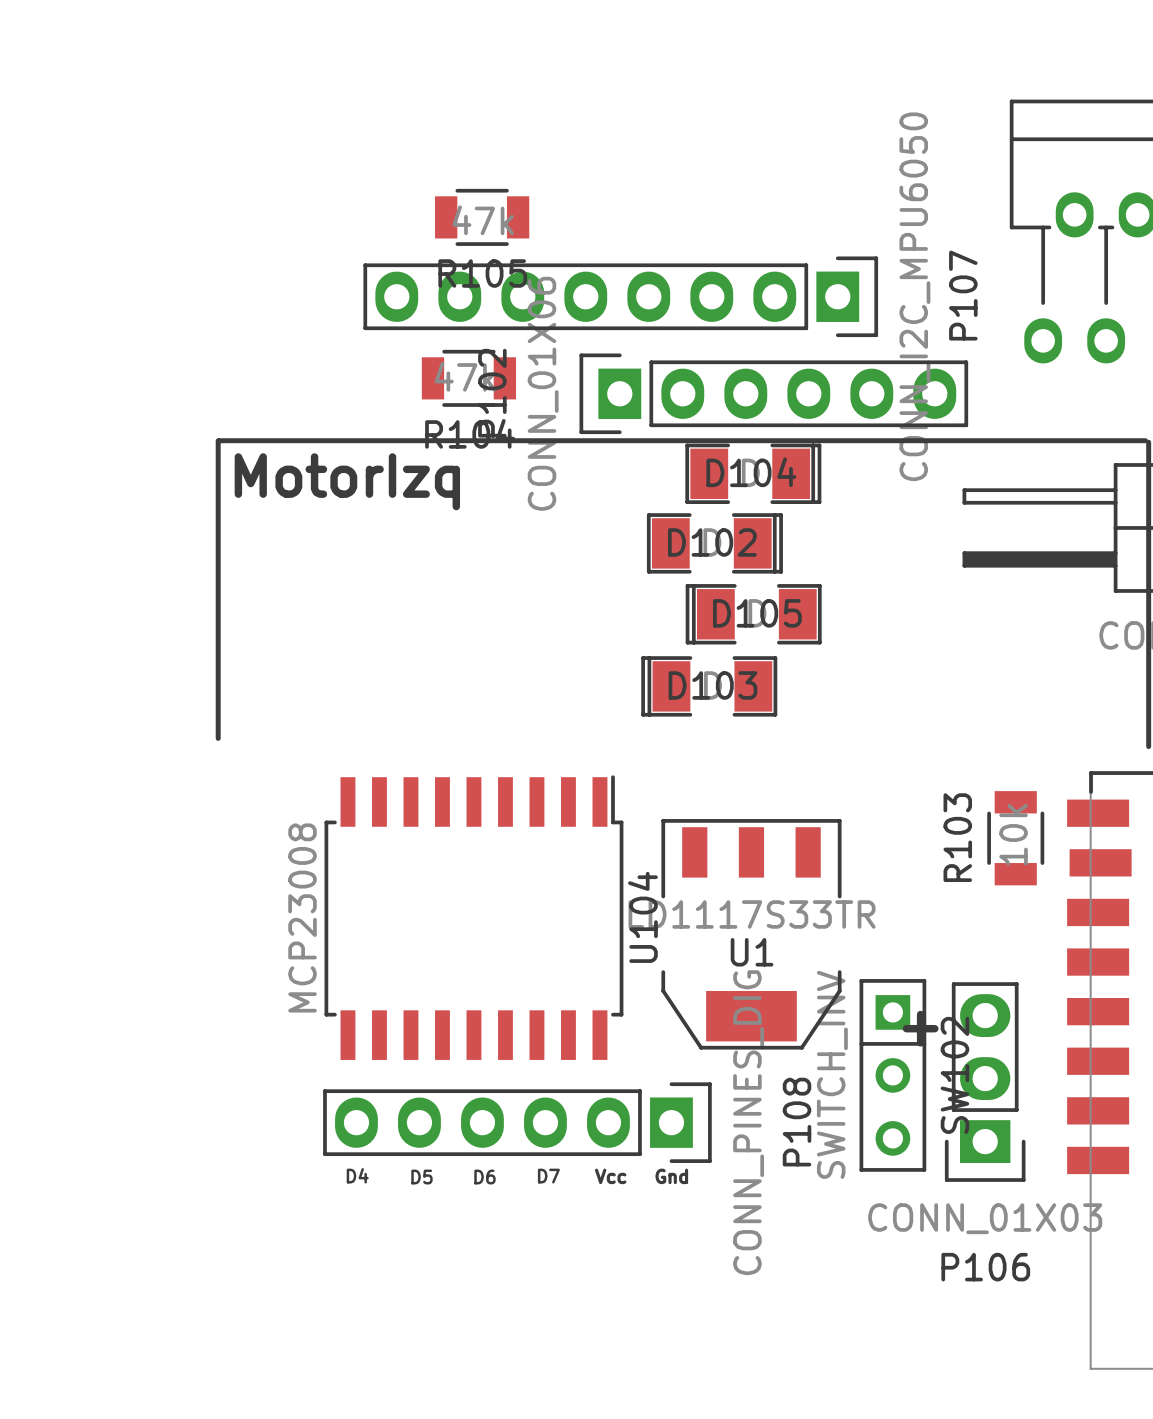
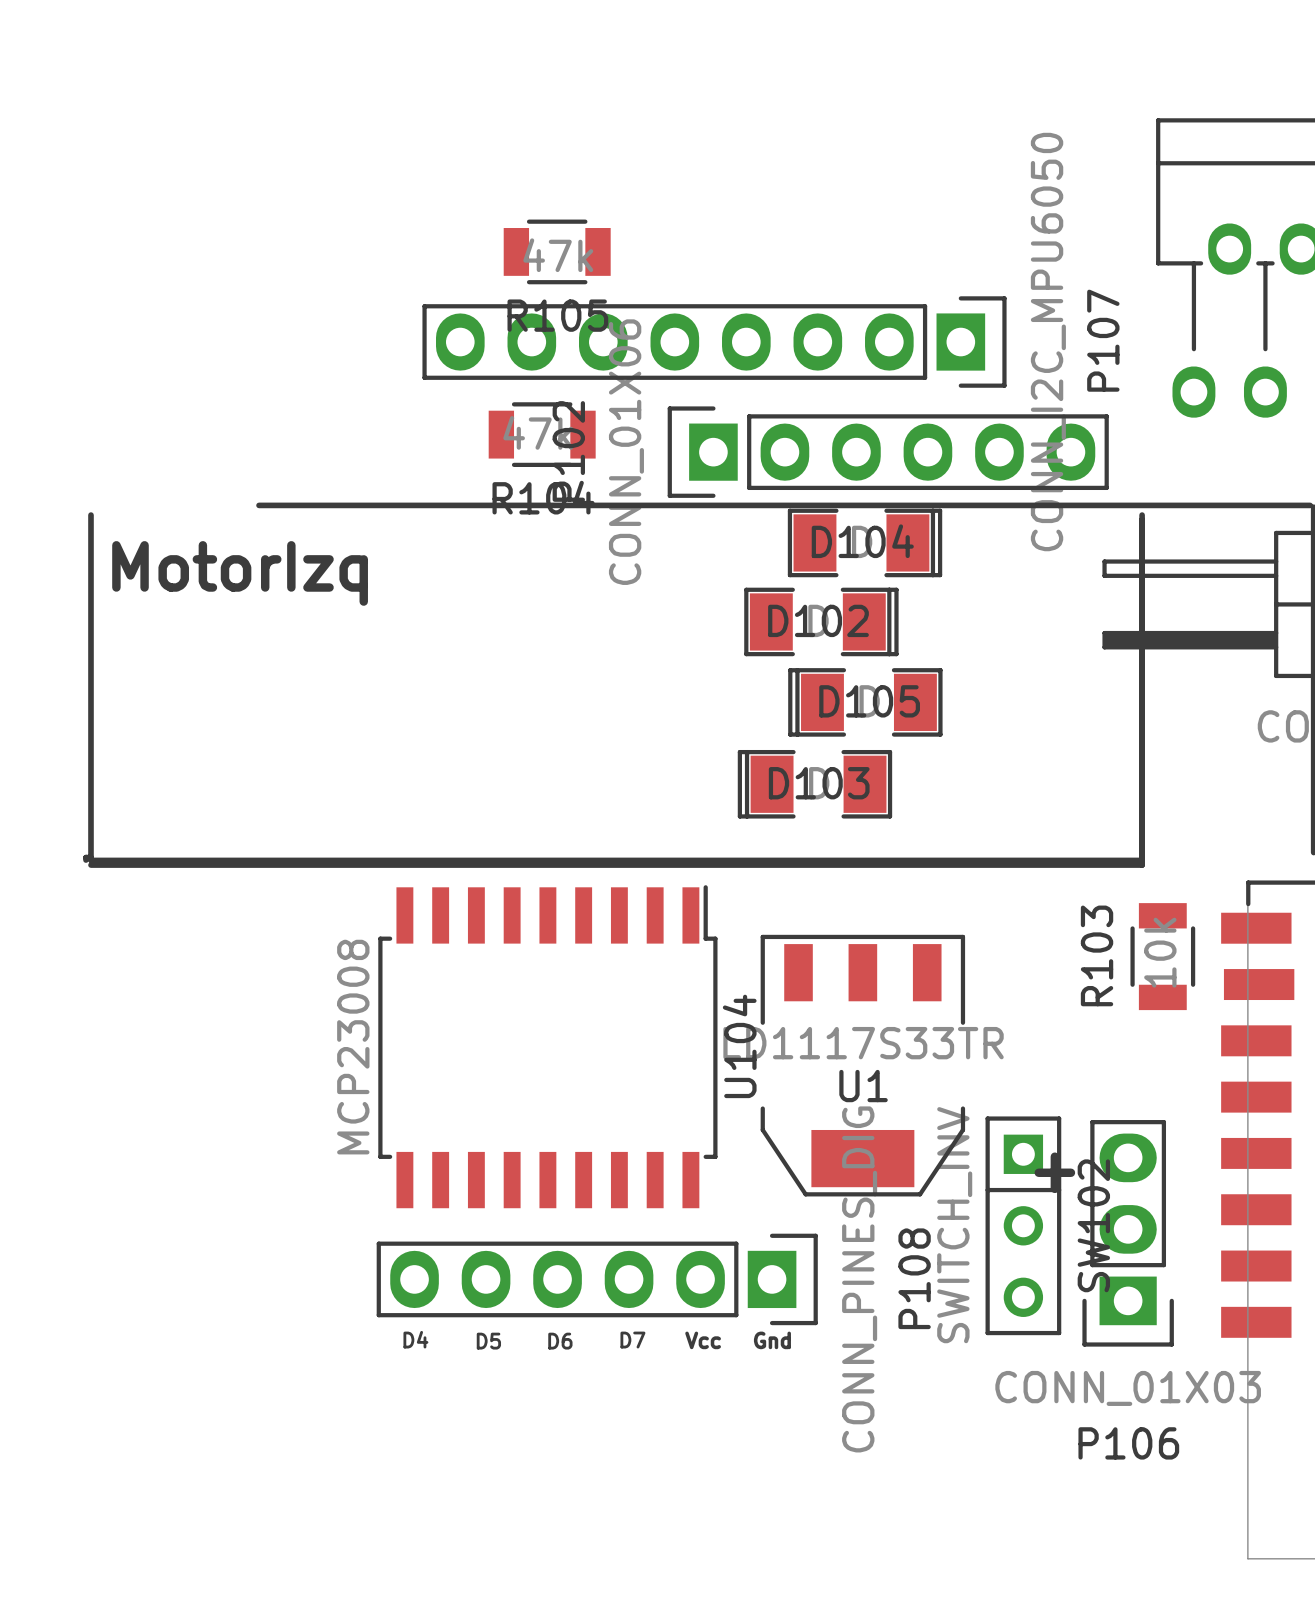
line: (218, 440) (218, 738) -> none
line: none -> (90, 515) (90, 857) (85, 857) (85, 860)
line: none -> (1142, 515) (1142, 865) (90, 865)
text position: MotorIzq (347, 481) -> MotorIzq (240, 573)
line: none -> (90, 860) (1142, 860)

